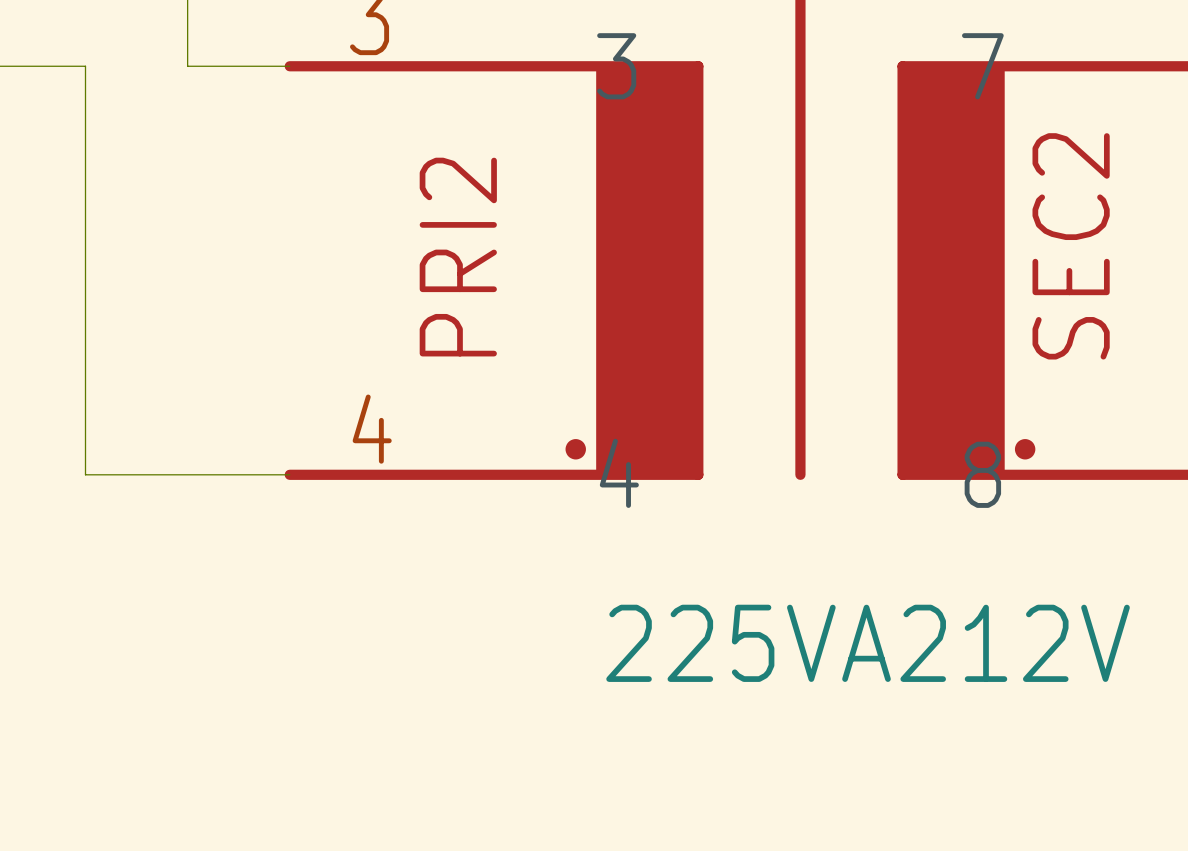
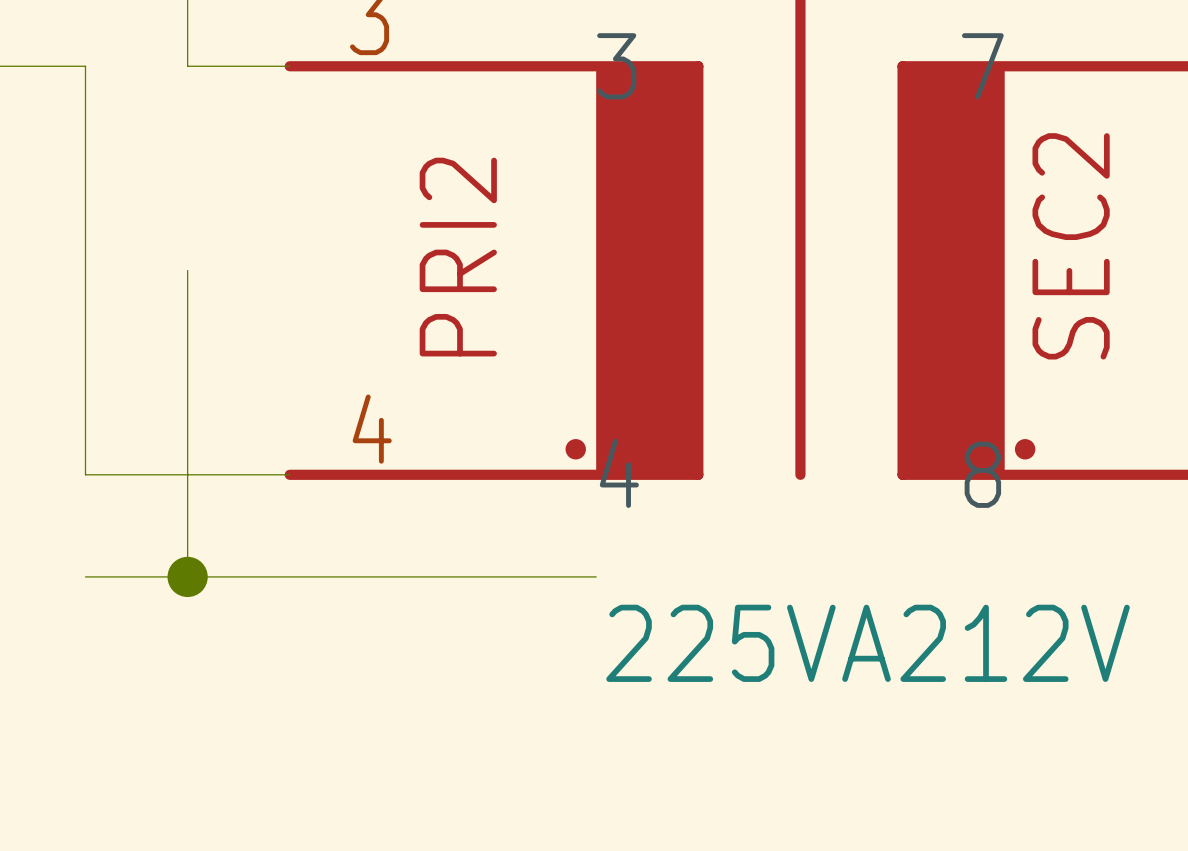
wire: none -> (187, 270) (187, 576)
wire: none -> (85, 576) (596, 576)
junction: none -> (187, 576)

